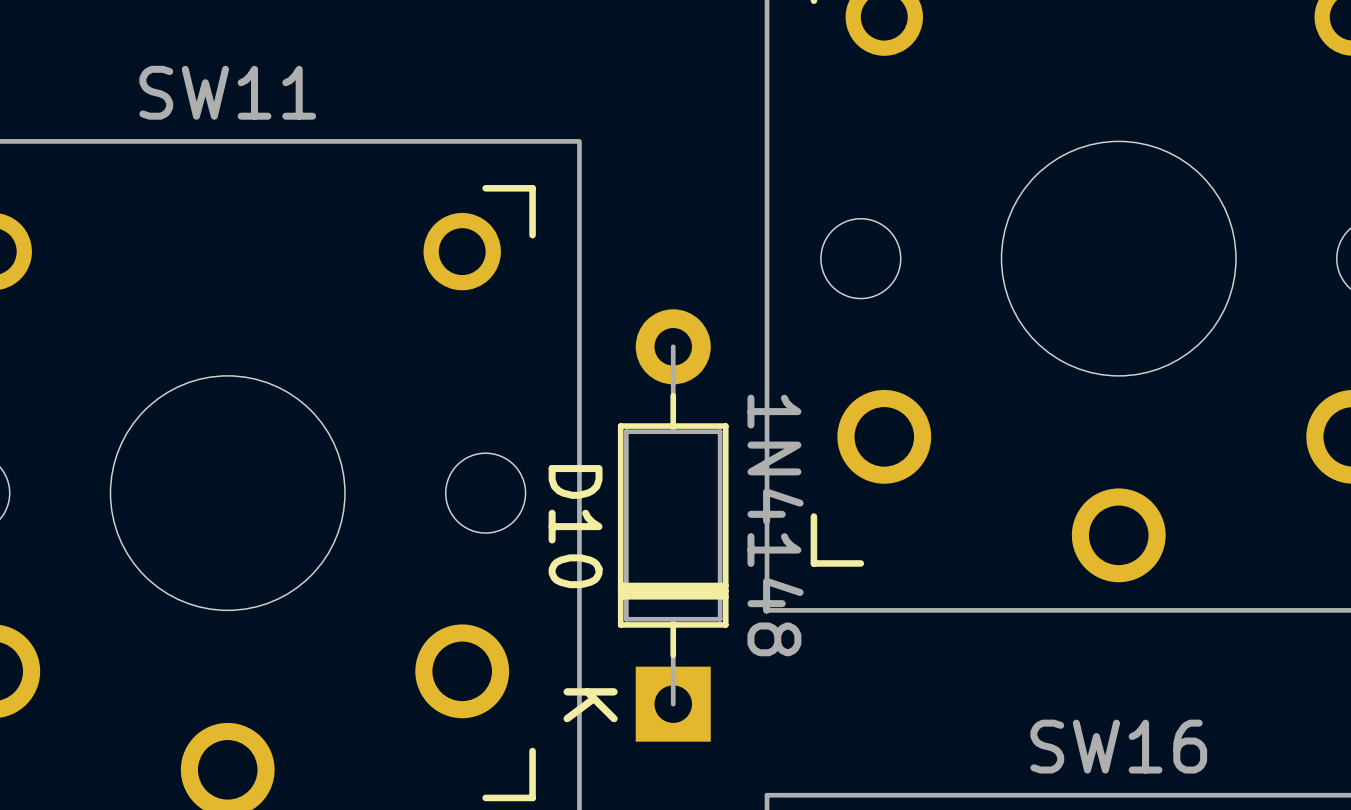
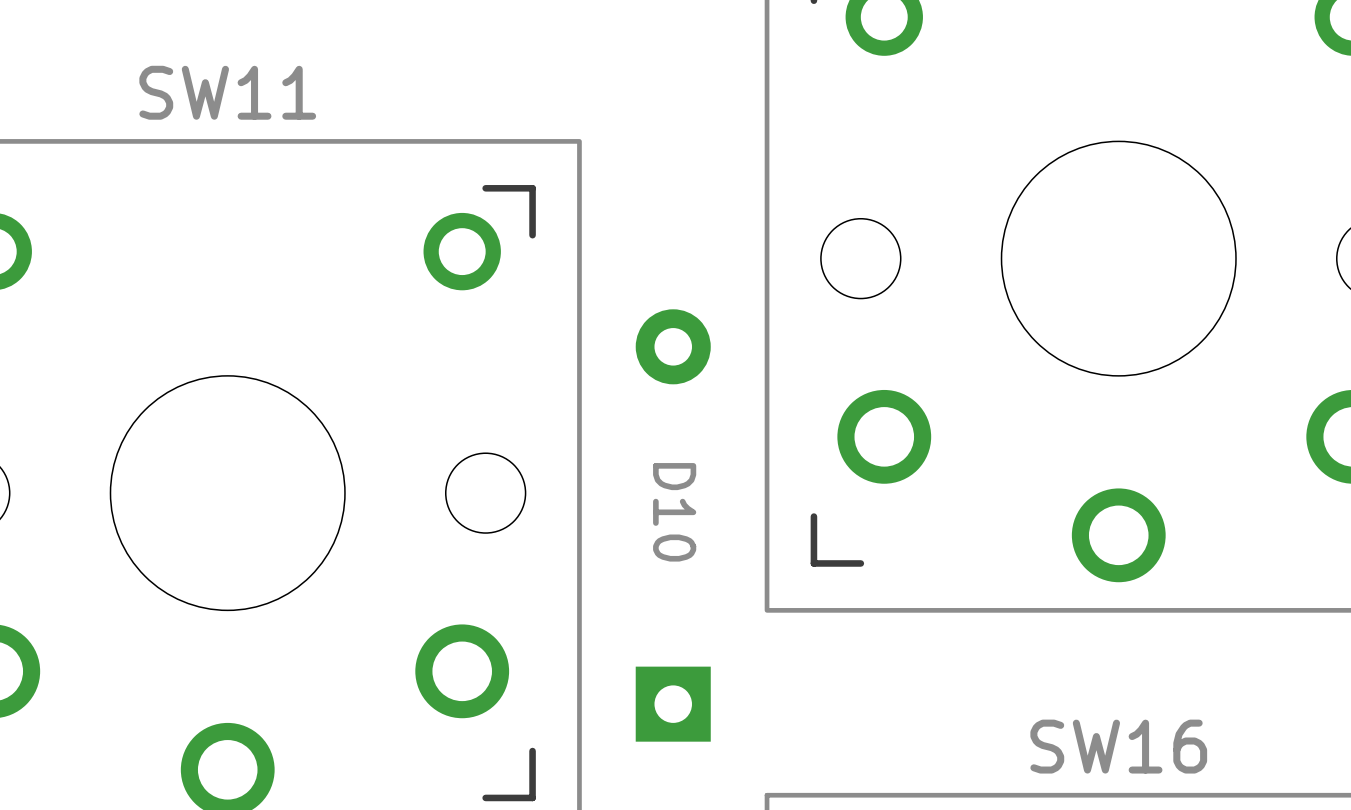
D10 side: bottom (673, 525) -> top (673, 525)

